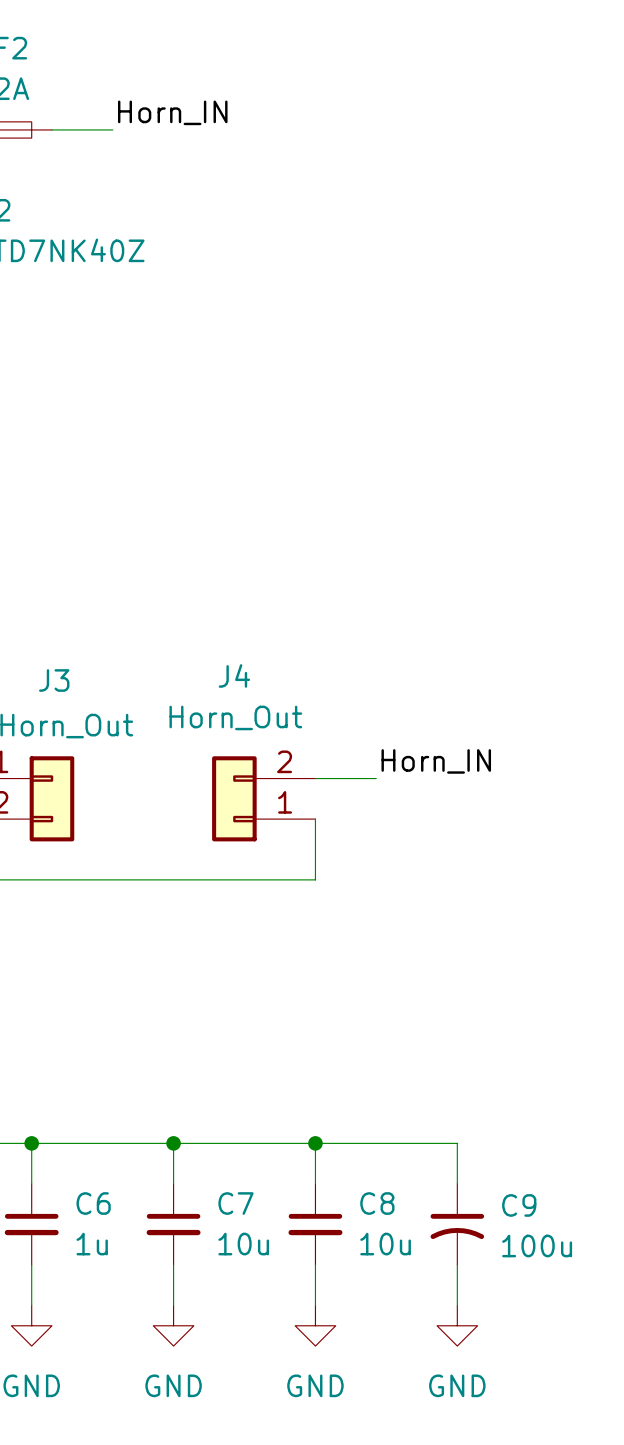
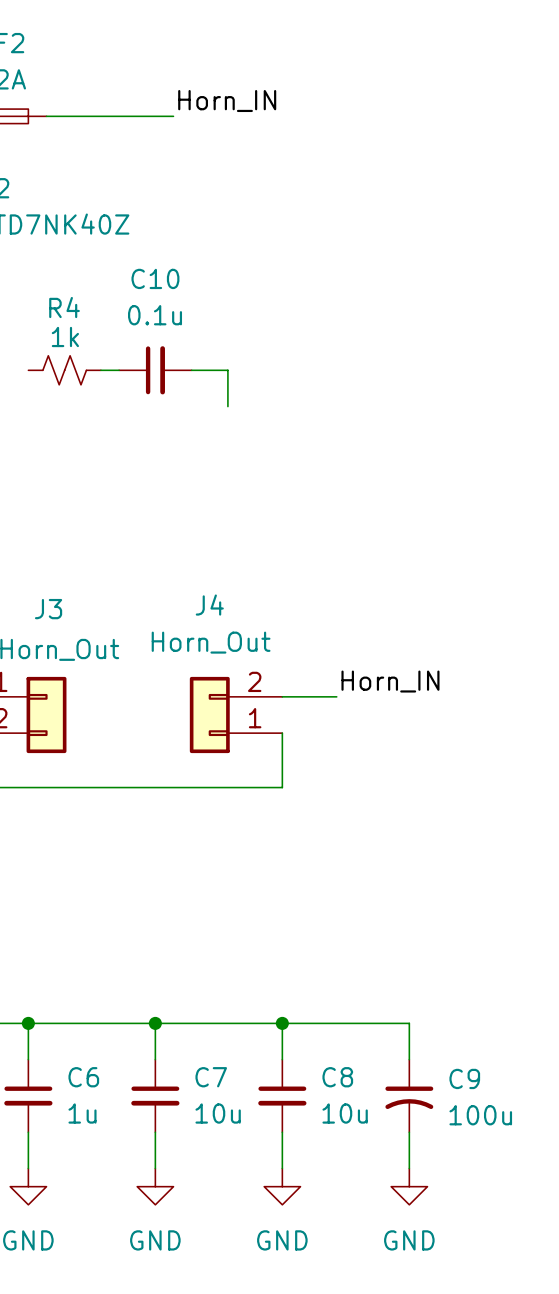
label position: Horn_IN (172, 112) -> Horn_IN (227, 101)
wire: none -> (100, 116) (173, 116)
R4: none -> 1k (64, 370)
wire: none -> (100, 370) (119, 370)
C10: none -> 0.1u (155, 370)
wire: none -> (191, 370) (227, 370) (227, 406)

